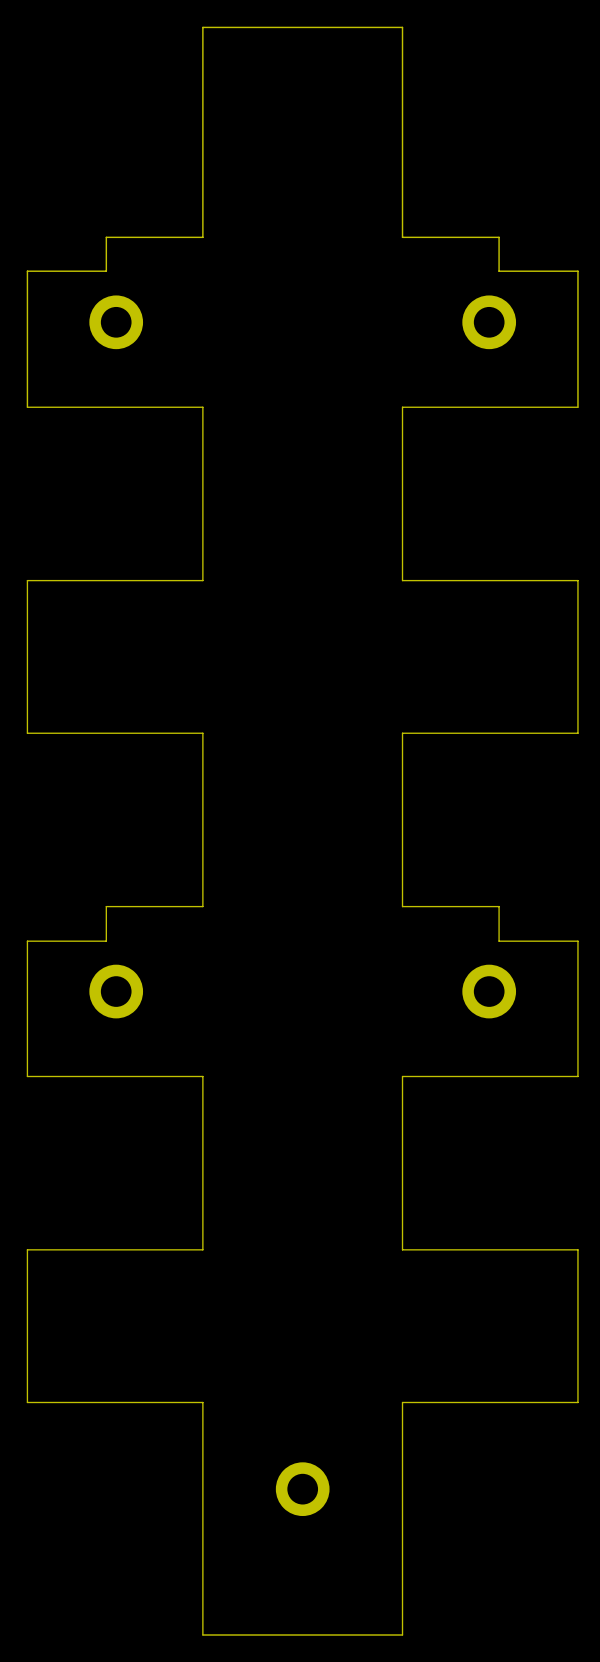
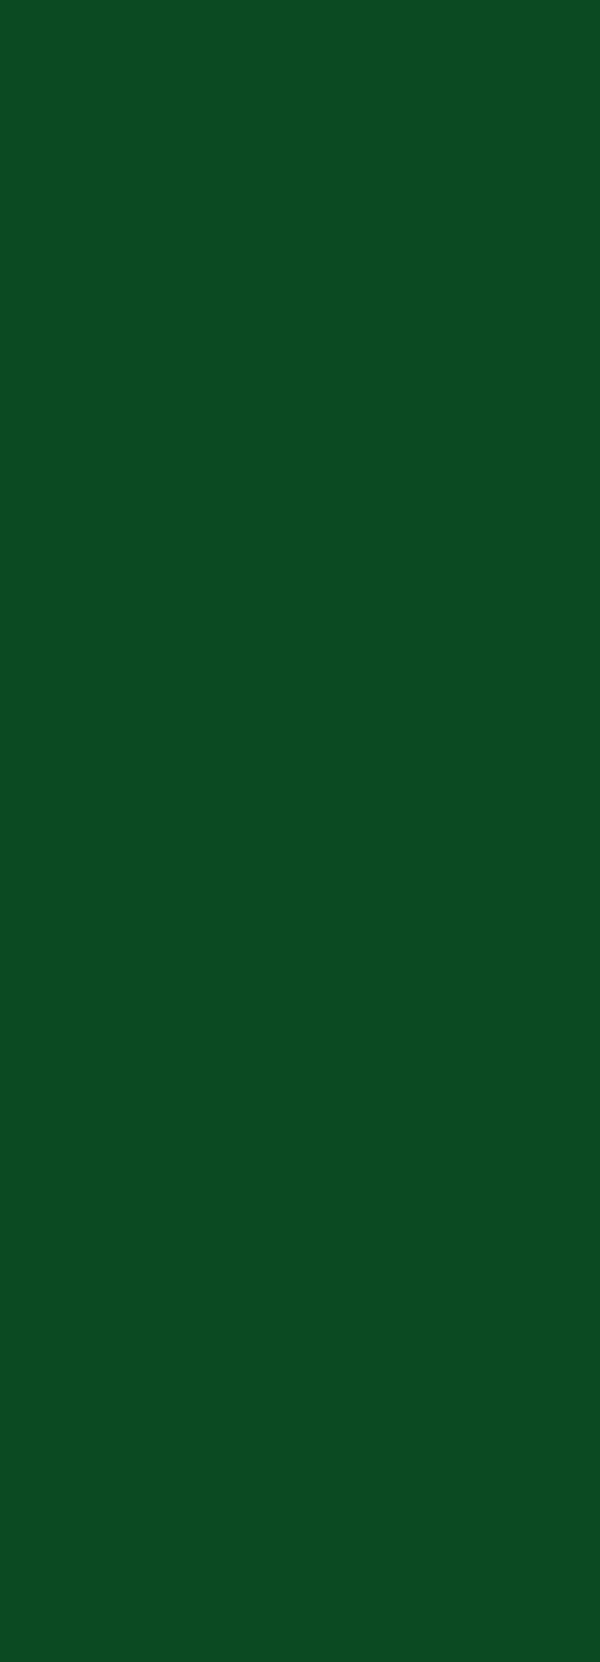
board edge: (402, 27) (202, 27) (202, 237) (106, 237) (106, 271) (27, 271) (27, 407) (202, 407) (202, 580) (27, 580) (27, 733) (202, 733) (202, 906) (106, 906) (106, 941) (27, 941) (27, 1076) (202, 1076) (202, 1249) (27, 1249) (27, 1402) (202, 1402) (202, 1635) (402, 1635) (402, 1402) (577, 1402) (577, 1249) (402, 1249) (402, 1076) (577, 1076) (577, 941) (499, 941) (499, 906) (402, 906) (402, 733) (577, 733) (577, 580) (402, 580) (402, 407) (577, 407) (577, 271) (499, 271) (499, 237) (402, 237) (402, 27) -> none
part: (116, 322) -> none
part: (489, 322) -> none
part: (116, 991) -> none
part: (489, 991) -> none
part: (302, 1489) -> none

